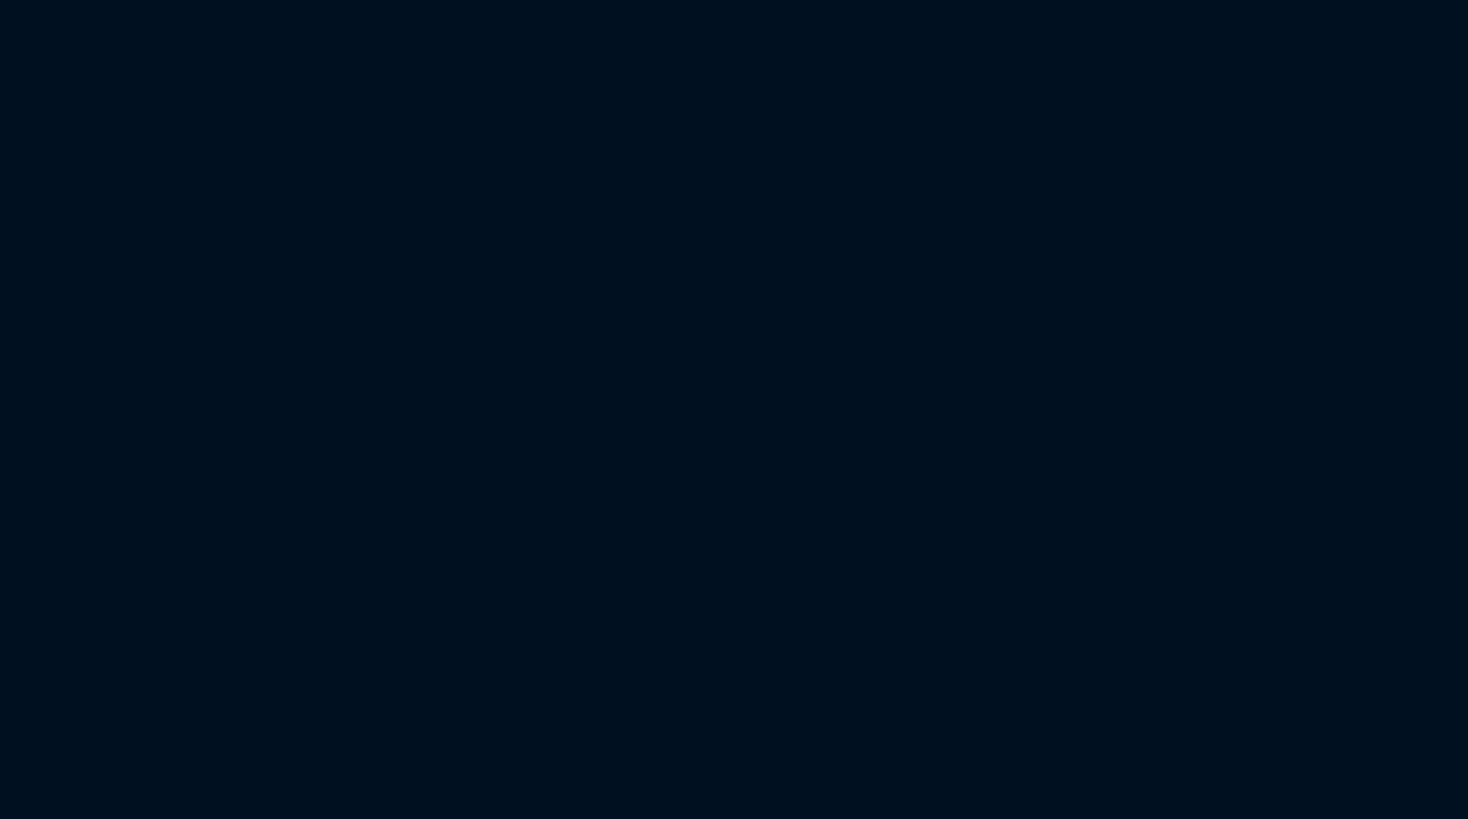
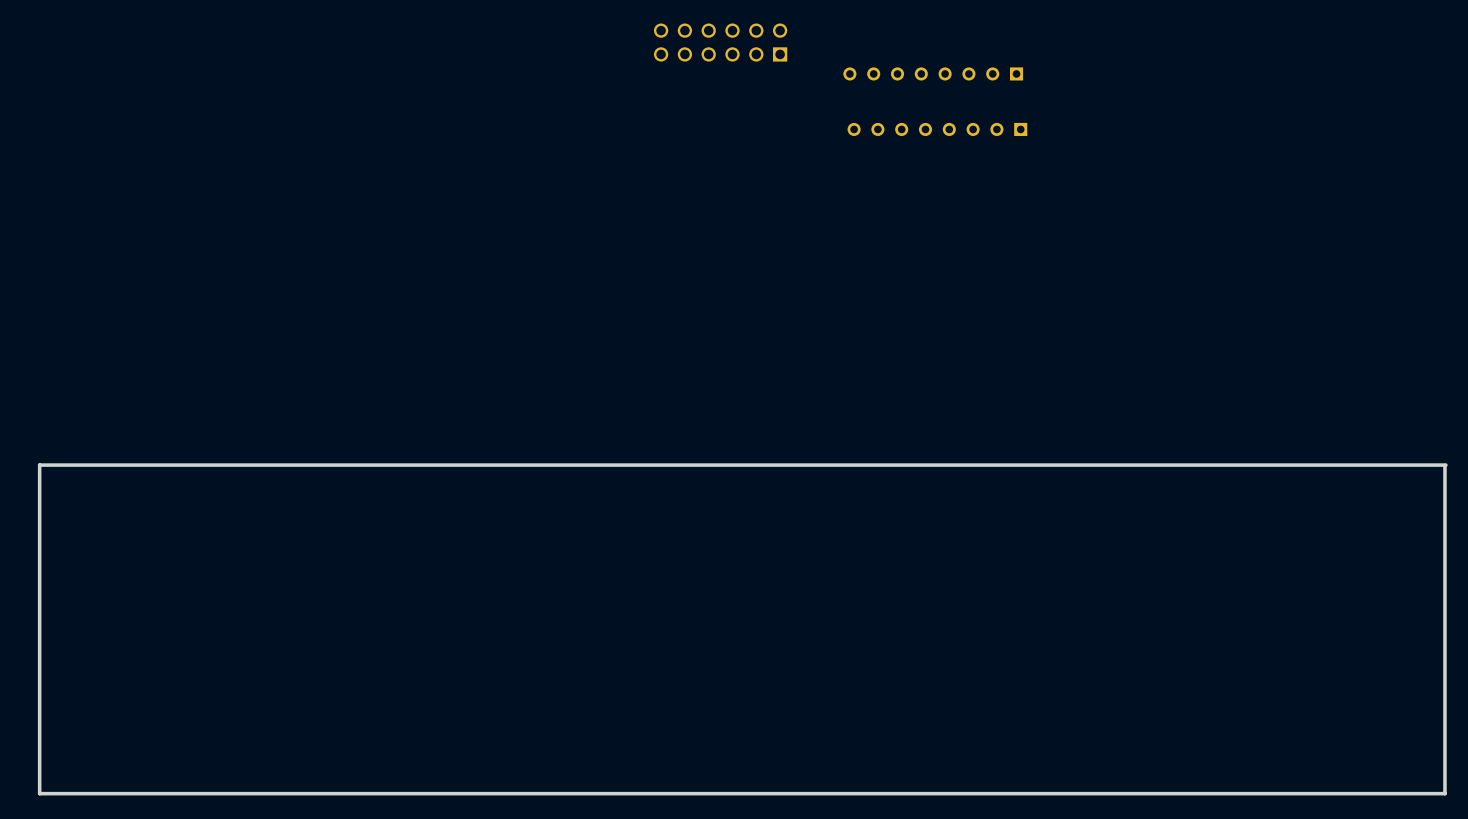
part: none -> (720, 42)
part: none -> (933, 73)
part: none -> (937, 129)
board edge: none -> (1445, 465) (39, 465) (39, 793) (1444, 793) (1444, 465)

